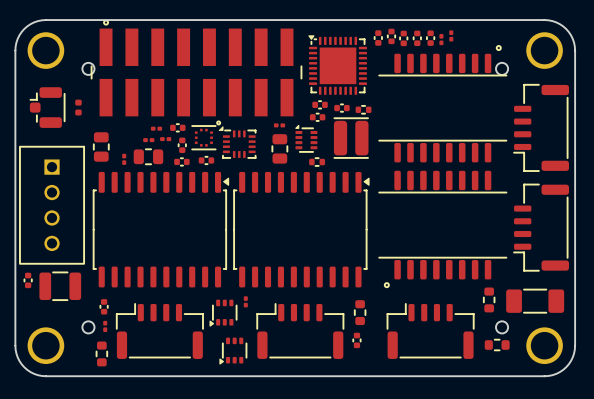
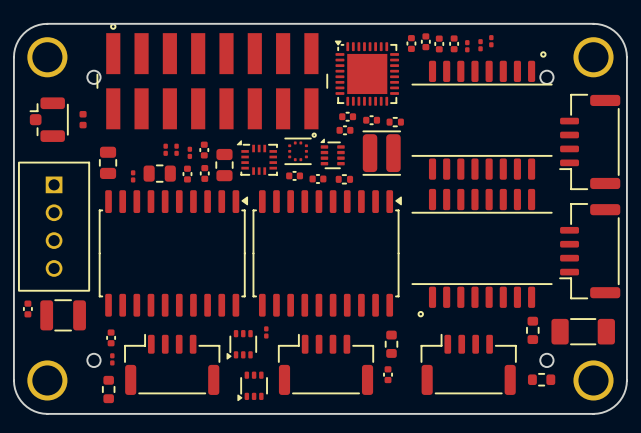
part footprint: [426, 30, 435, 46] -> [465, 40, 470, 53]
part: (279, 125) -> none
part: (177, 127) -> none
part: (156, 128) -> none
part: none -> (165, 149)
part: none -> (204, 150)
part position: (206, 135) -> (300, 148)
part: none -> (189, 152)
part rotation: 0° (165, 139) -> 90° clockwise (176, 149)
part: (148, 140) -> none
part: (182, 145) -> none
part position: (279, 148) -> (224, 165)
part: none -> (204, 173)
part: none -> (187, 174)
part: none -> (294, 175)
part: (206, 160) -> none
part: (181, 161) -> none
part: none -> (317, 178)

